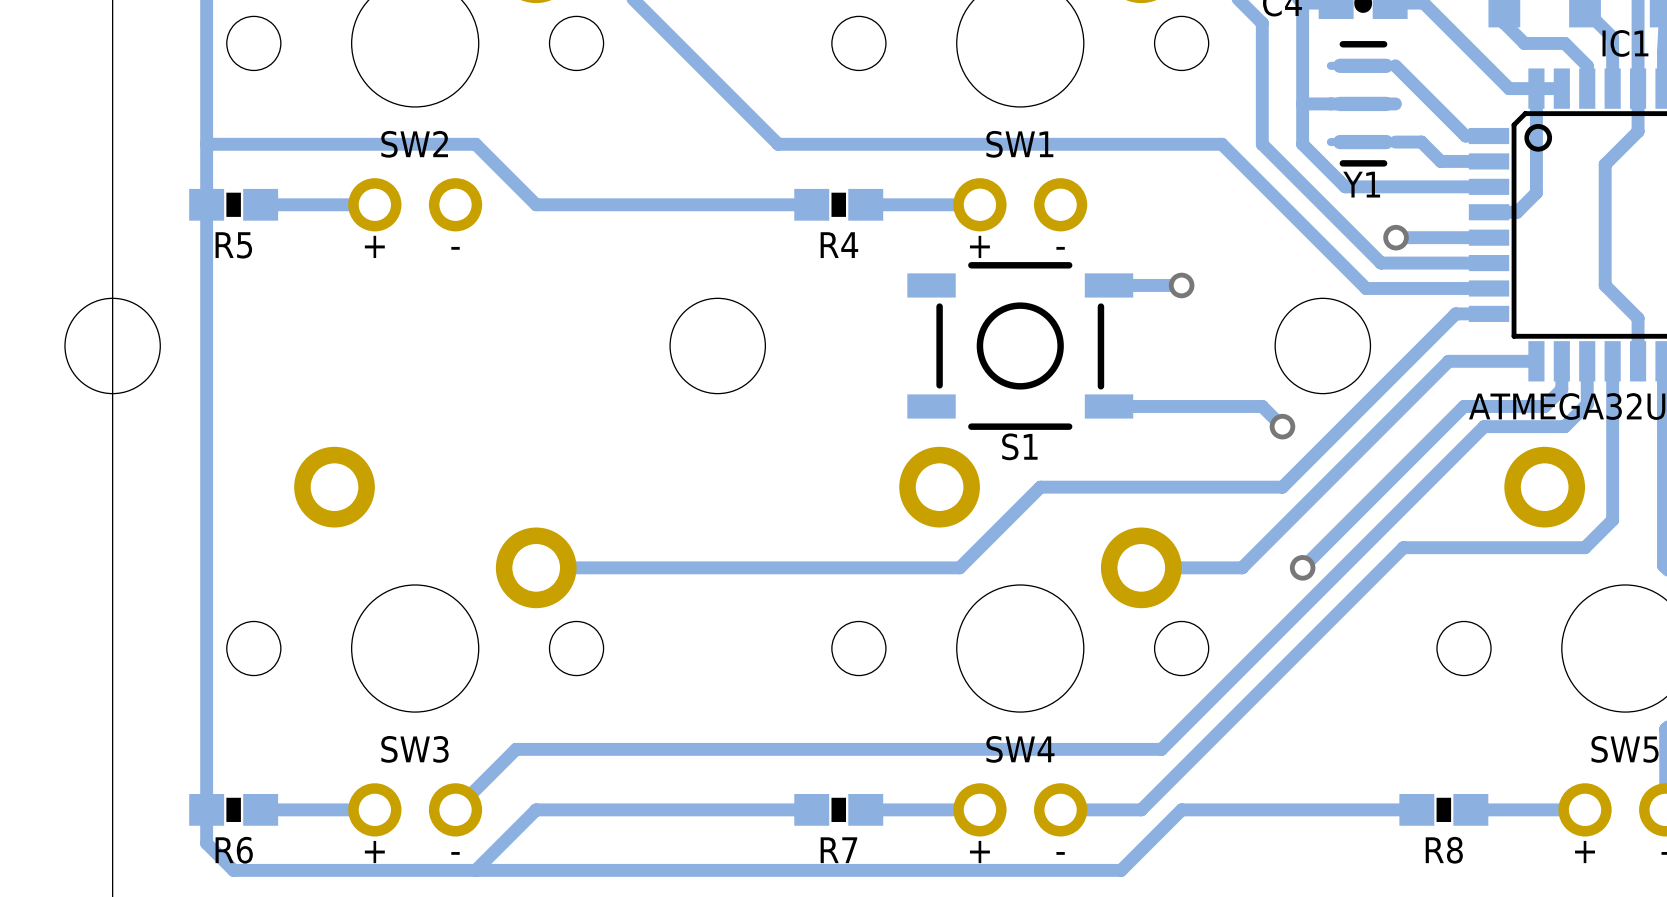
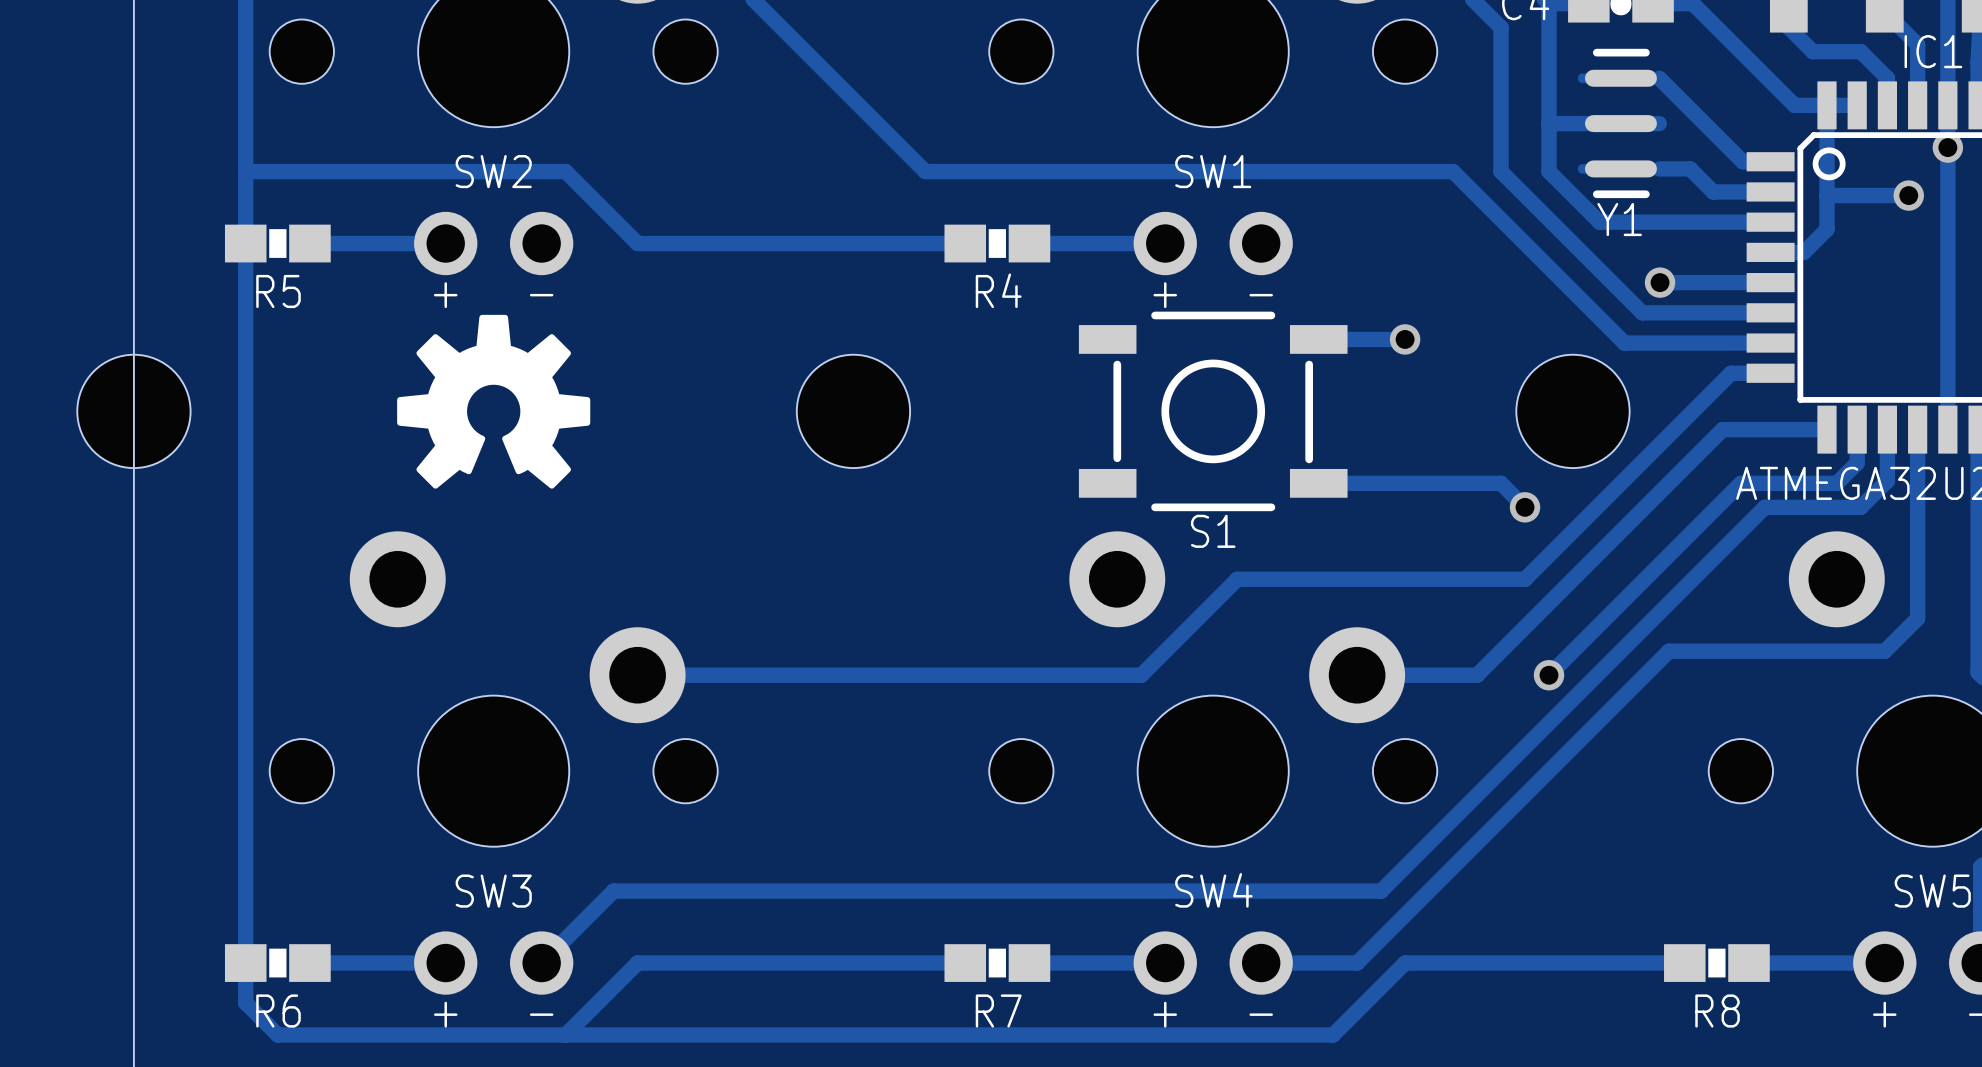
via: none -> (1947, 147)
track: (1638, 131) (1605, 164) (1605, 285) (1638, 318) -> (1947, 156) (1947, 378)
track: none -> (1908, 195) (1826, 195)
via: none -> (1908, 195)
drawing: none -> [397, 314, 591, 489]

